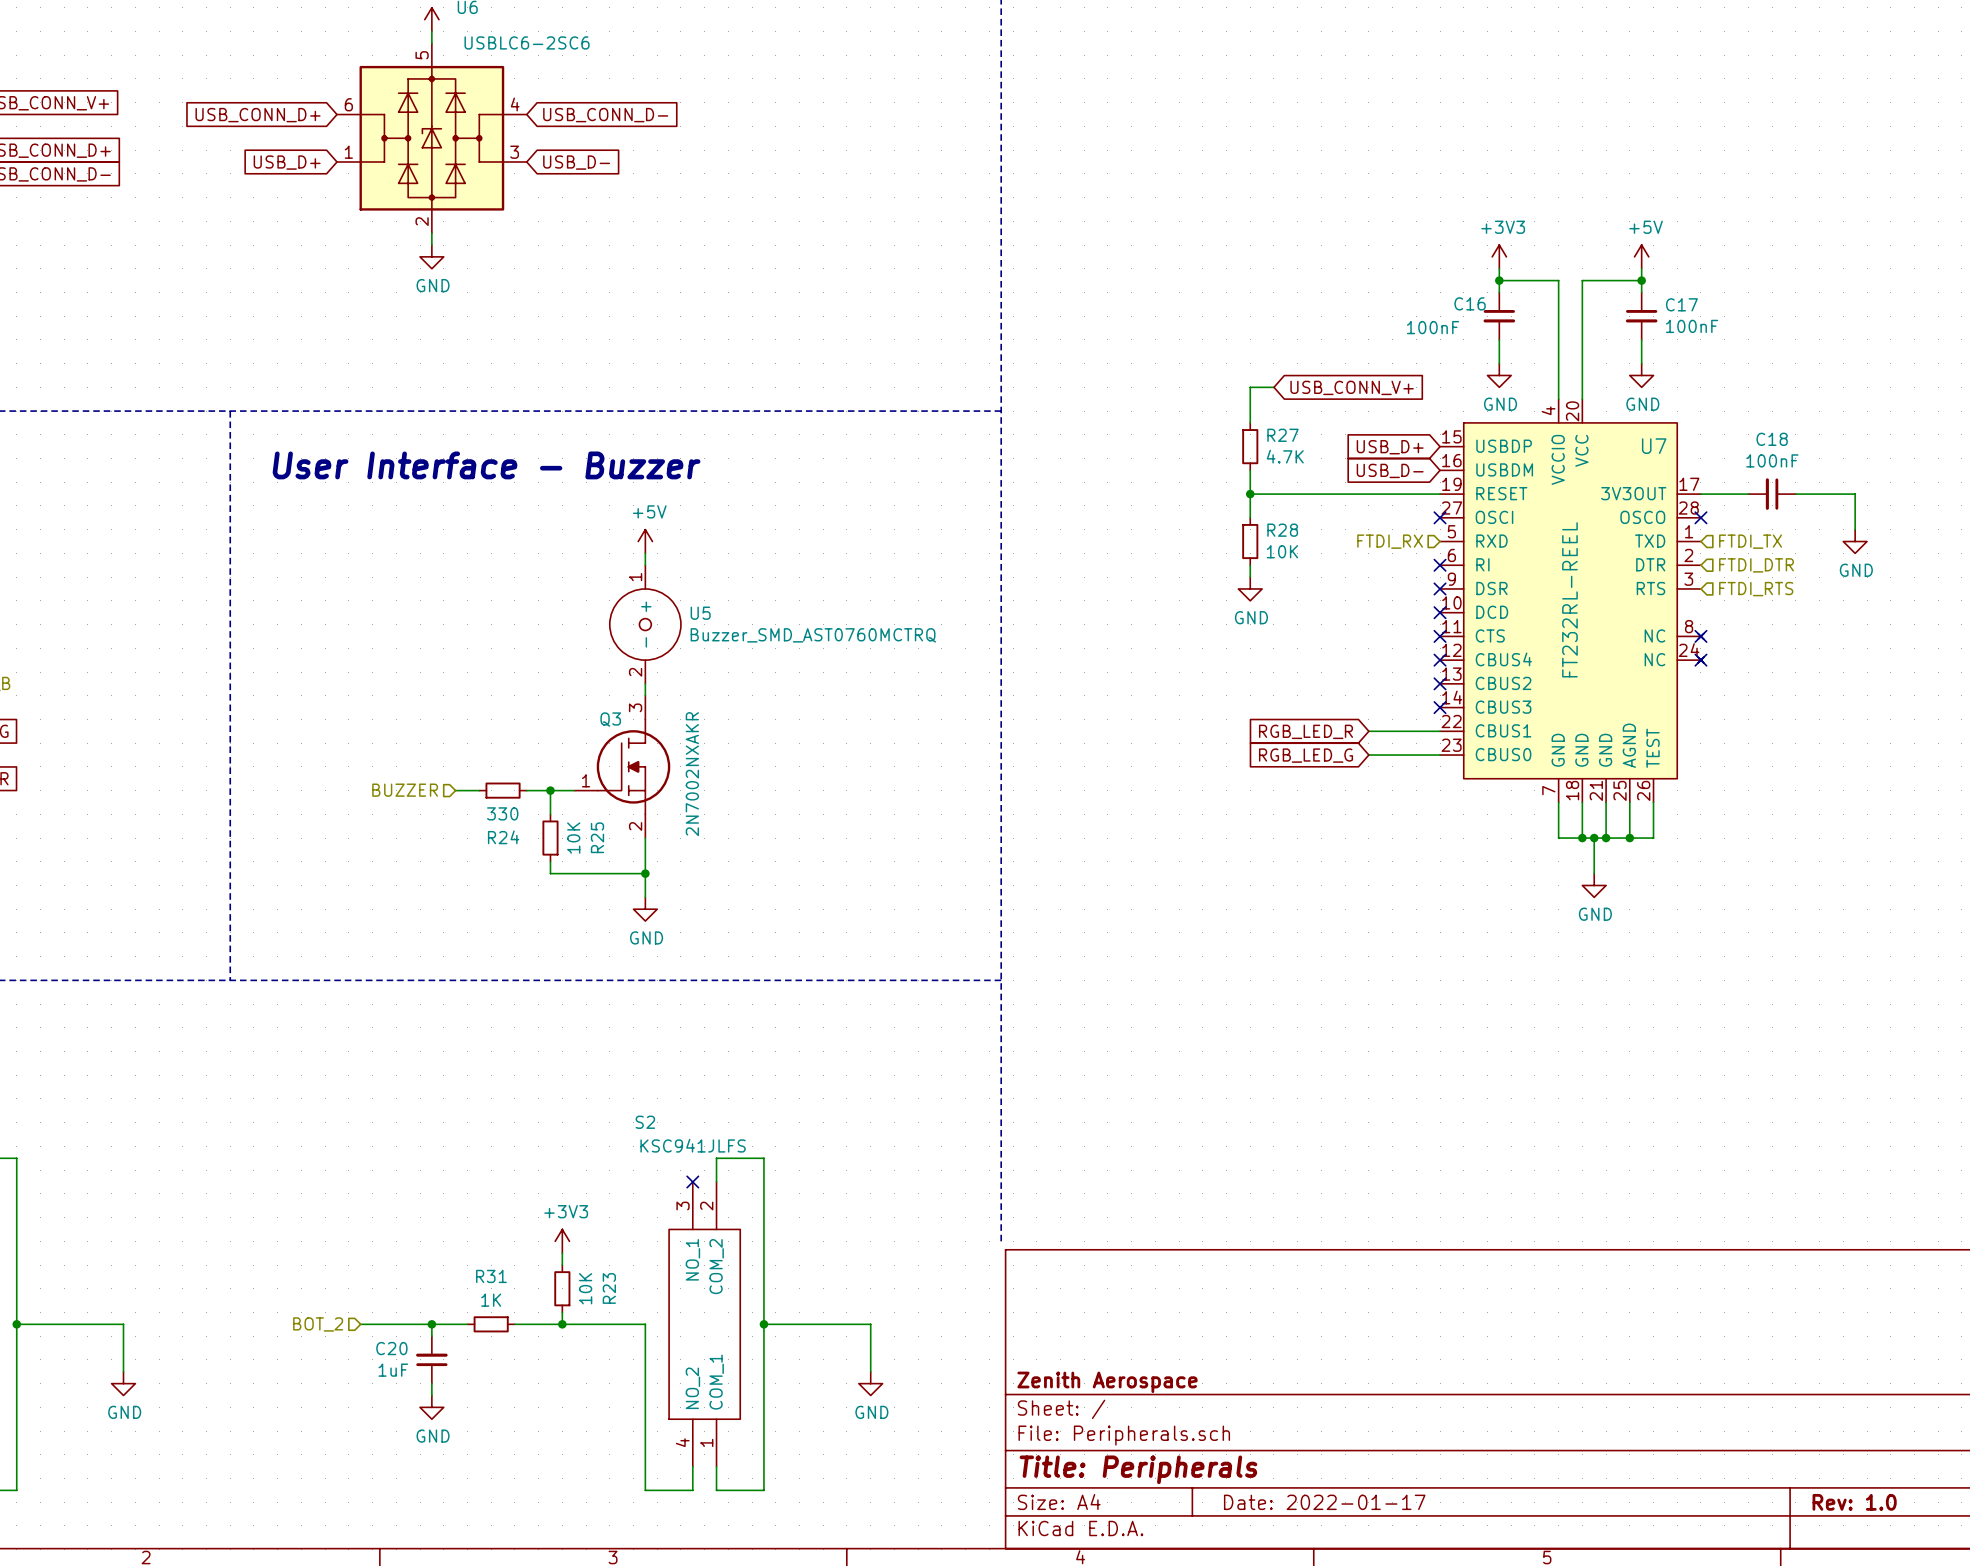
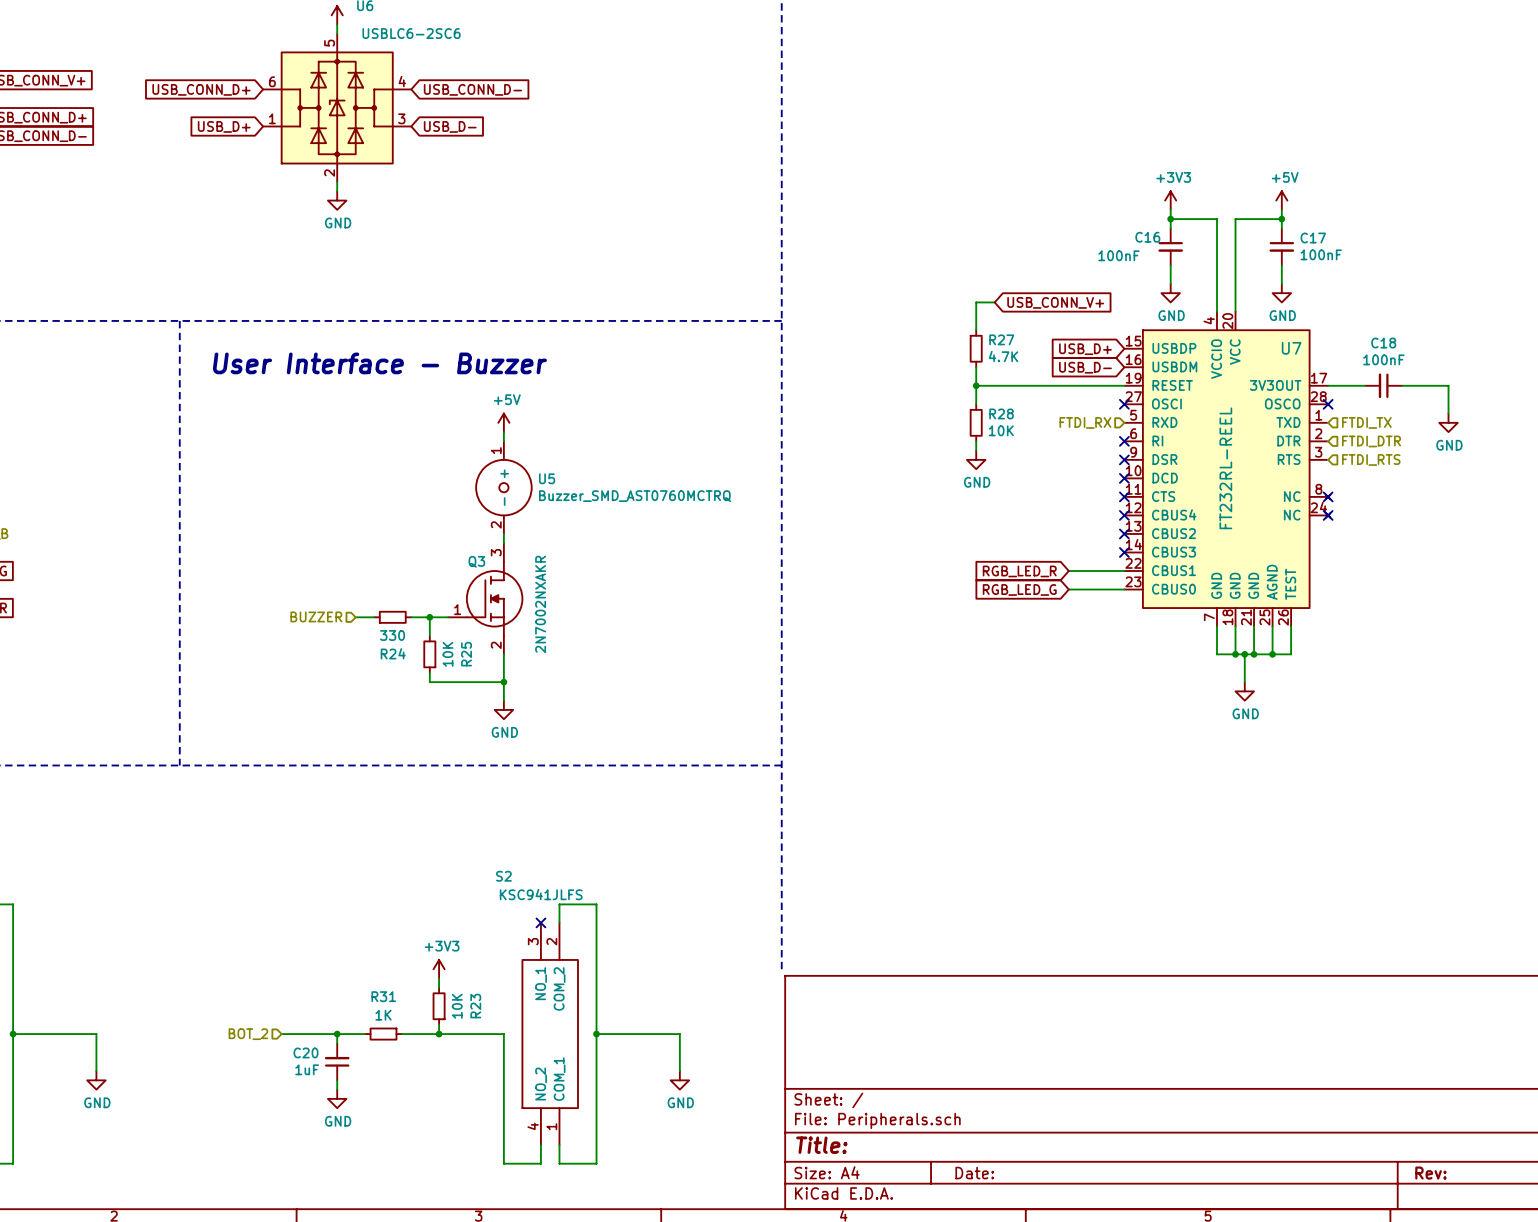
title block: Zenith Aerospace (1107, 1382) -> none
title block: Title: Peripherals (1138, 1469) -> Title: (821, 1145)
title block: Date: 2022-01-17 (1324, 1502) -> Date: (974, 1173)
title block: Rev: 1.0 (1854, 1502) -> Rev: (1430, 1173)

